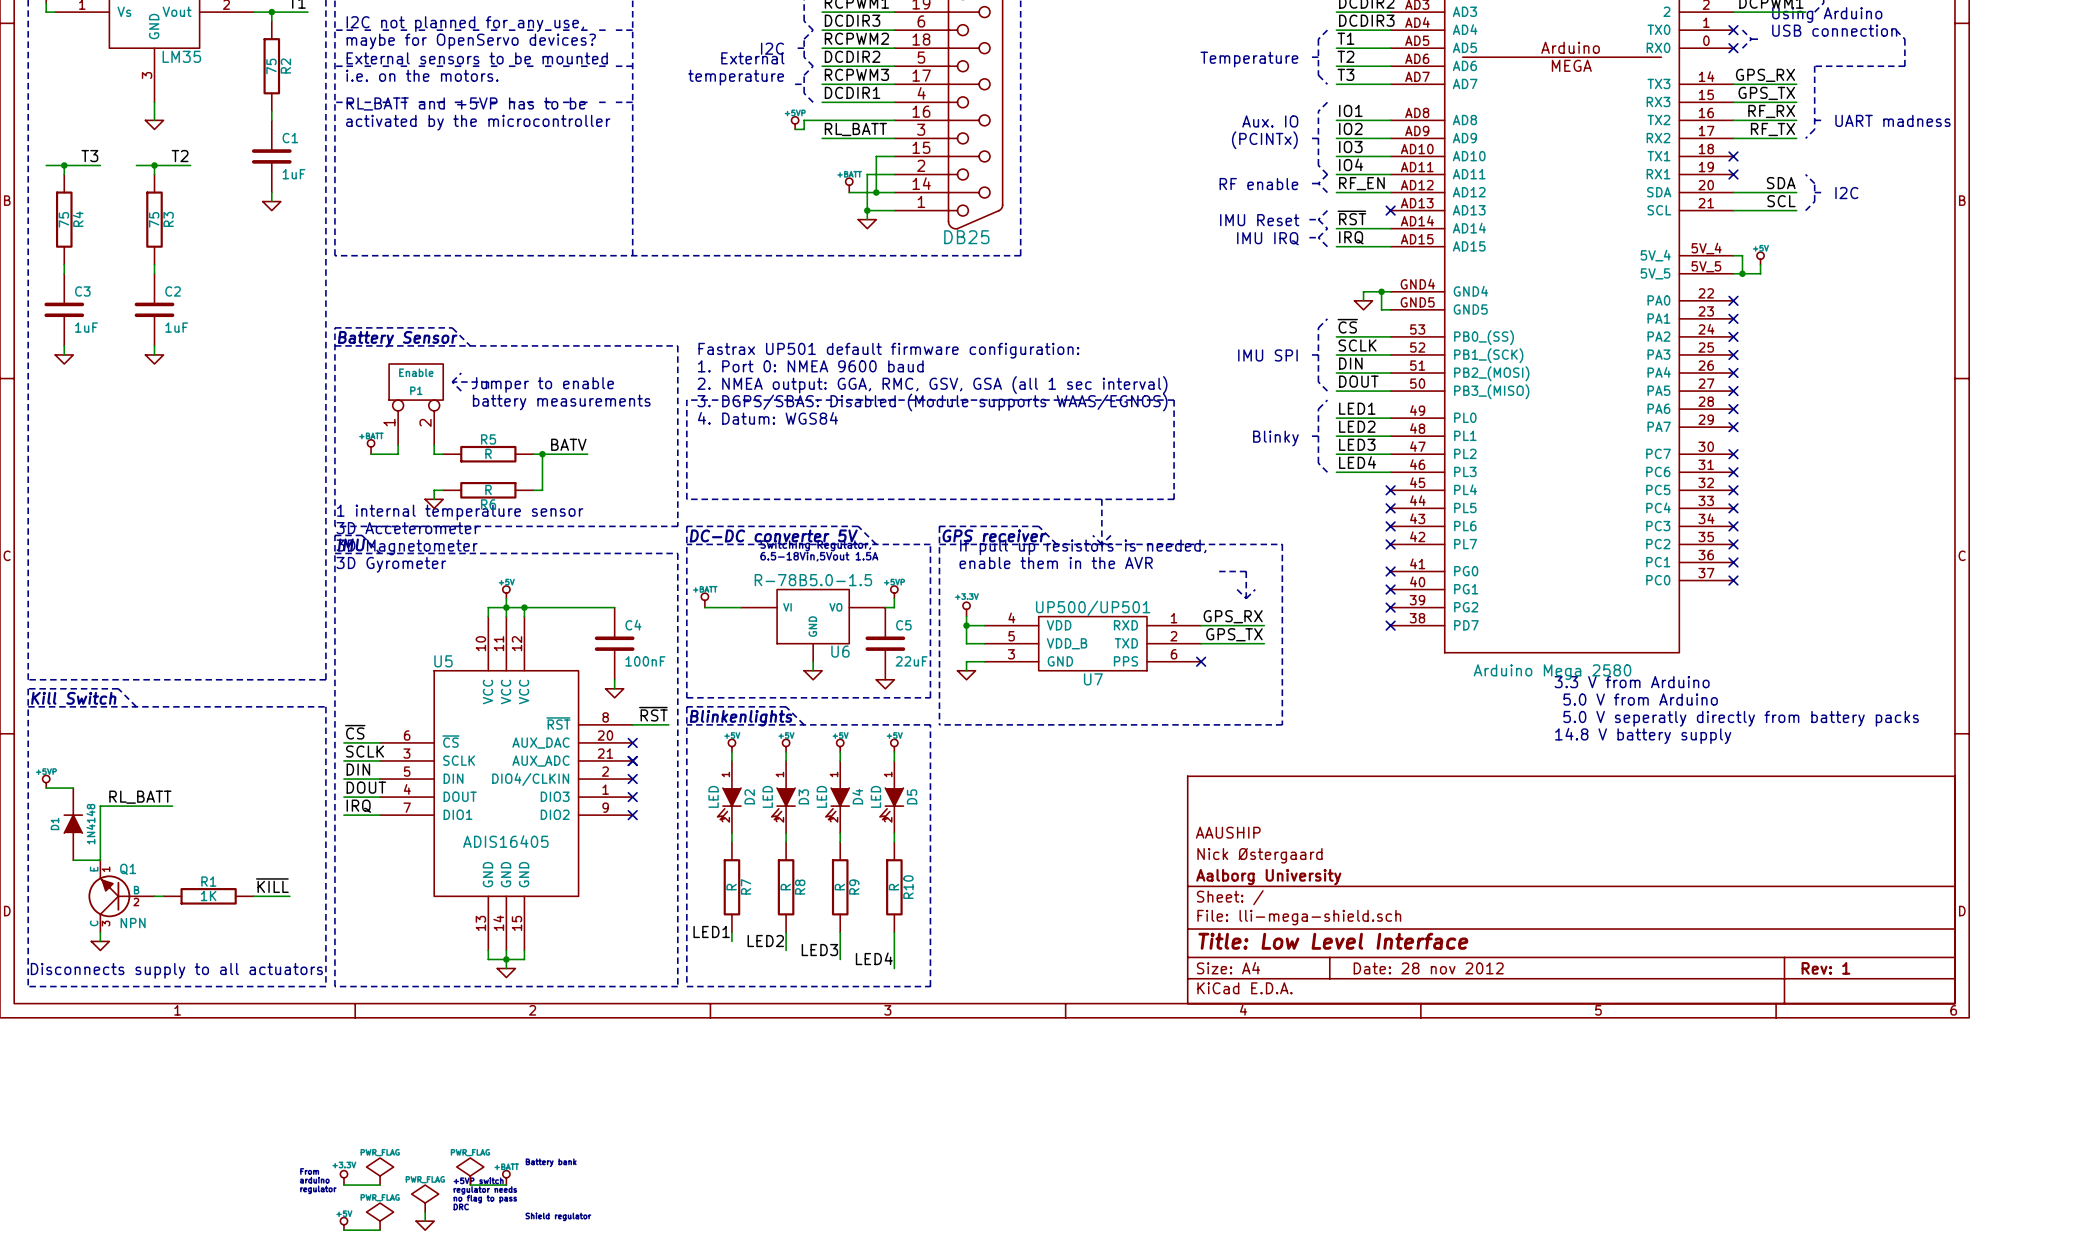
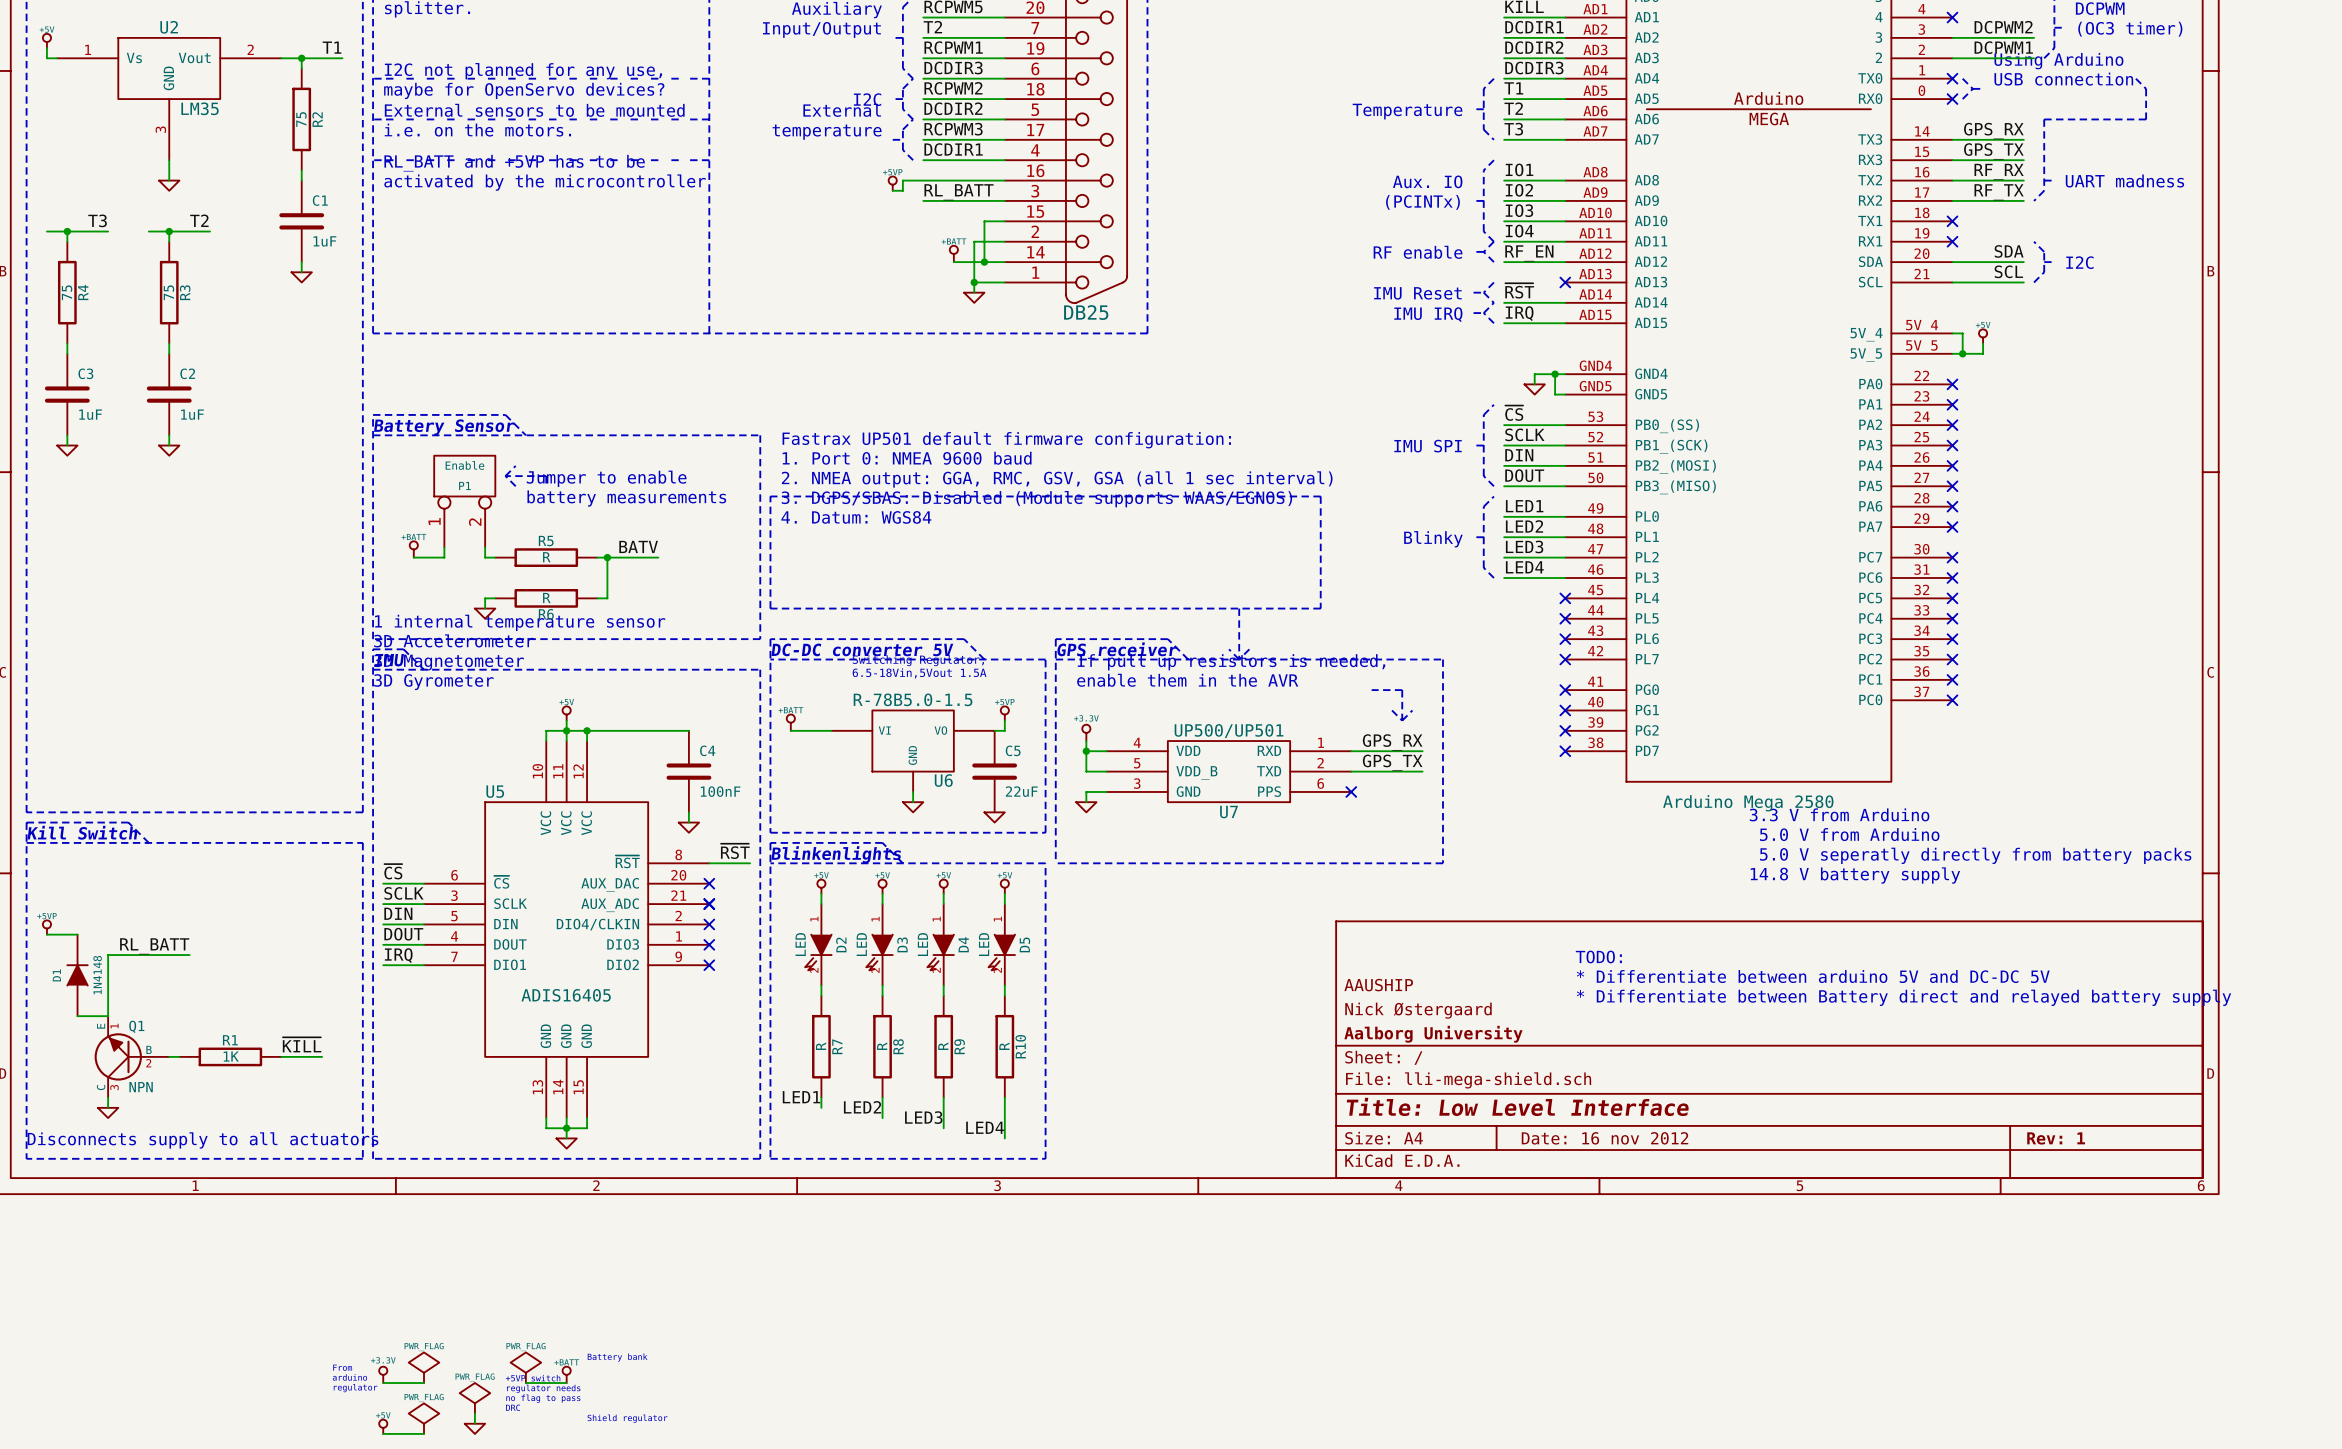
text: none -> TODO: (1598, 956)
text: none -> * Differentiate between arduino 5V and DC-DC 5V (1813, 976)
text: none -> * Differentiate between Battery direct and relayed battery supply (1903, 997)
title block: Date: 28 nov 2012 (1428, 968) -> Date: 16 nov 2012 (1604, 1138)

